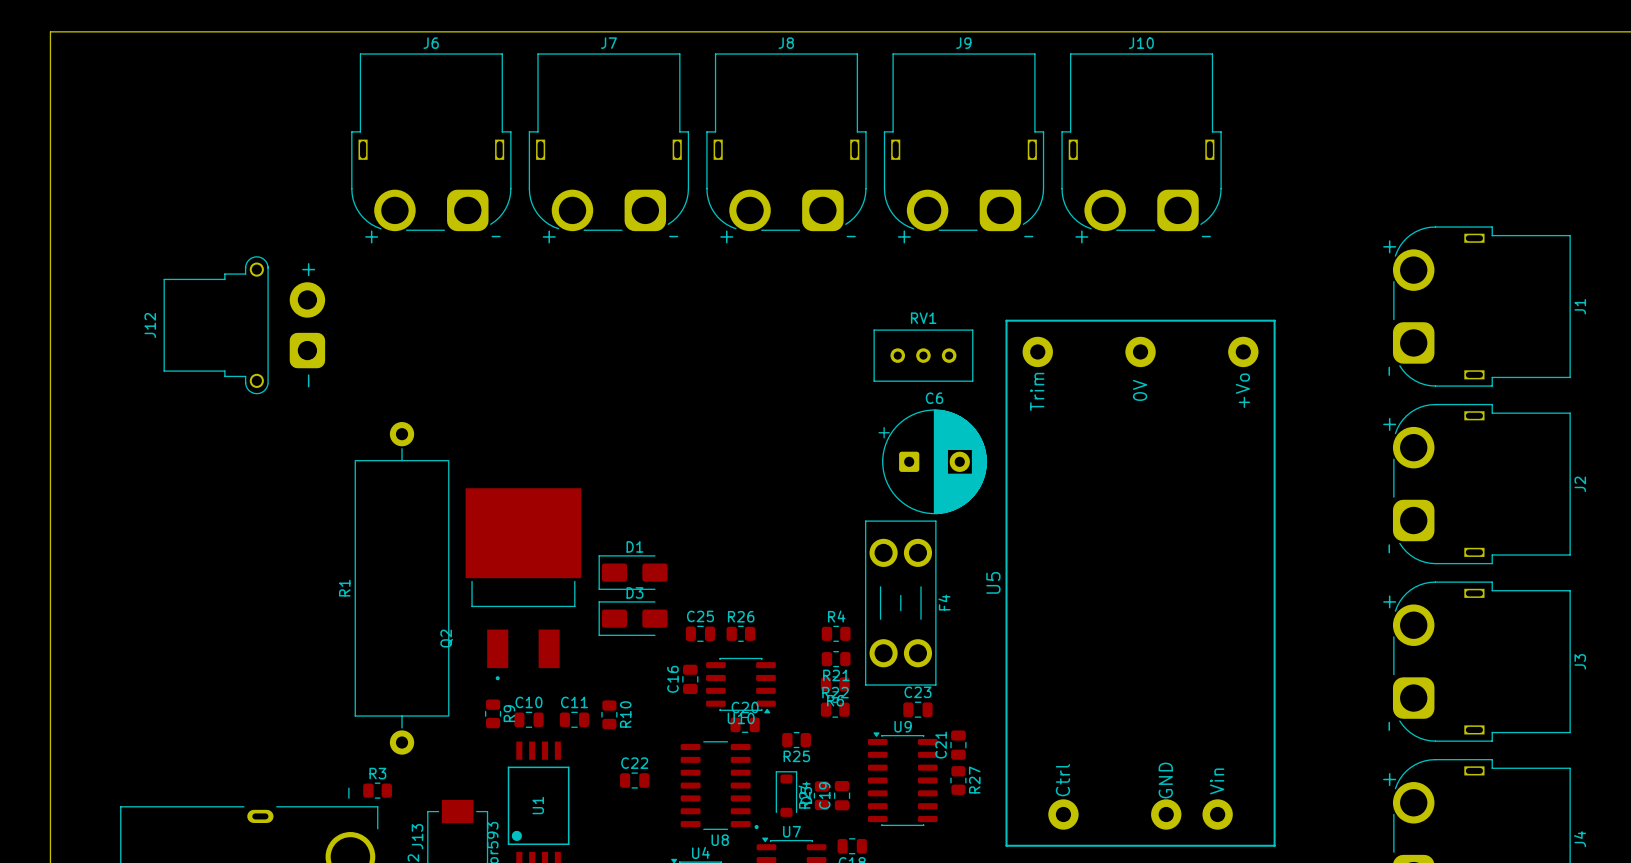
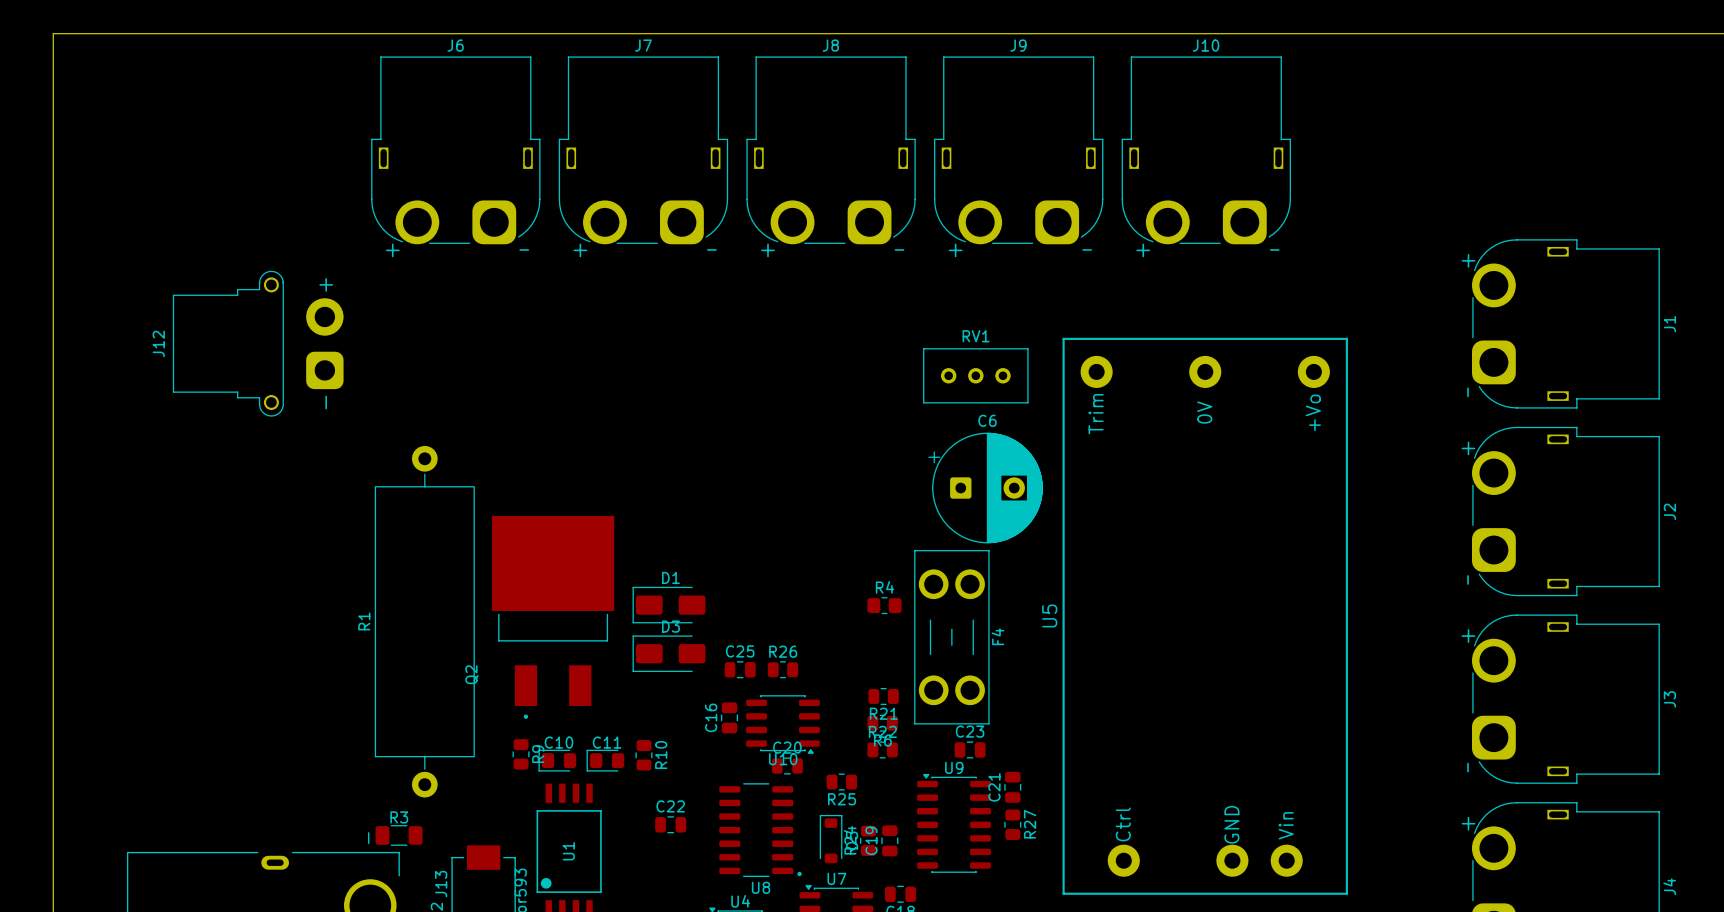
R4 footprint: [821, 625, 851, 642] -> [867, 597, 902, 615]
C10 footprint: [514, 711, 544, 728] -> [538, 749, 577, 772]
C11 footprint: [559, 711, 590, 728] -> [586, 749, 625, 772]
R3 footprint: [363, 782, 393, 799] -> [375, 825, 423, 846]

